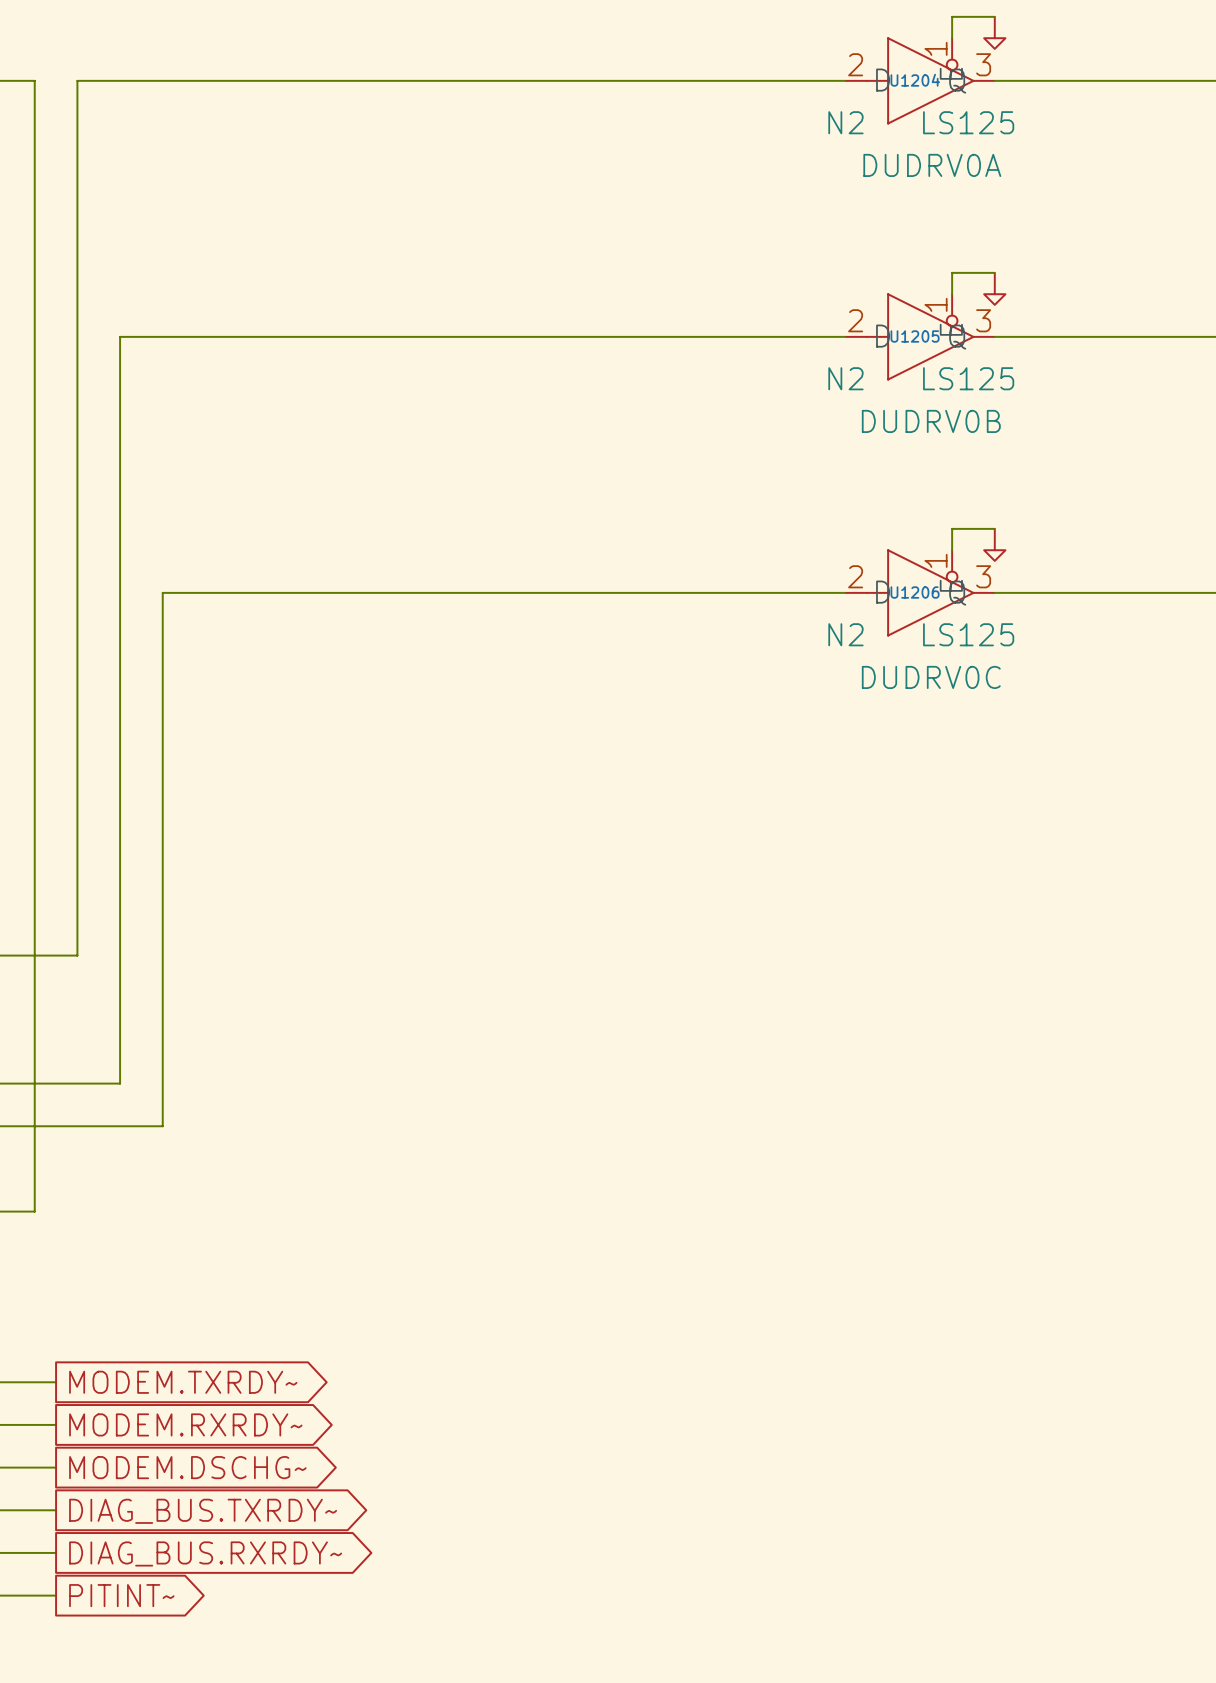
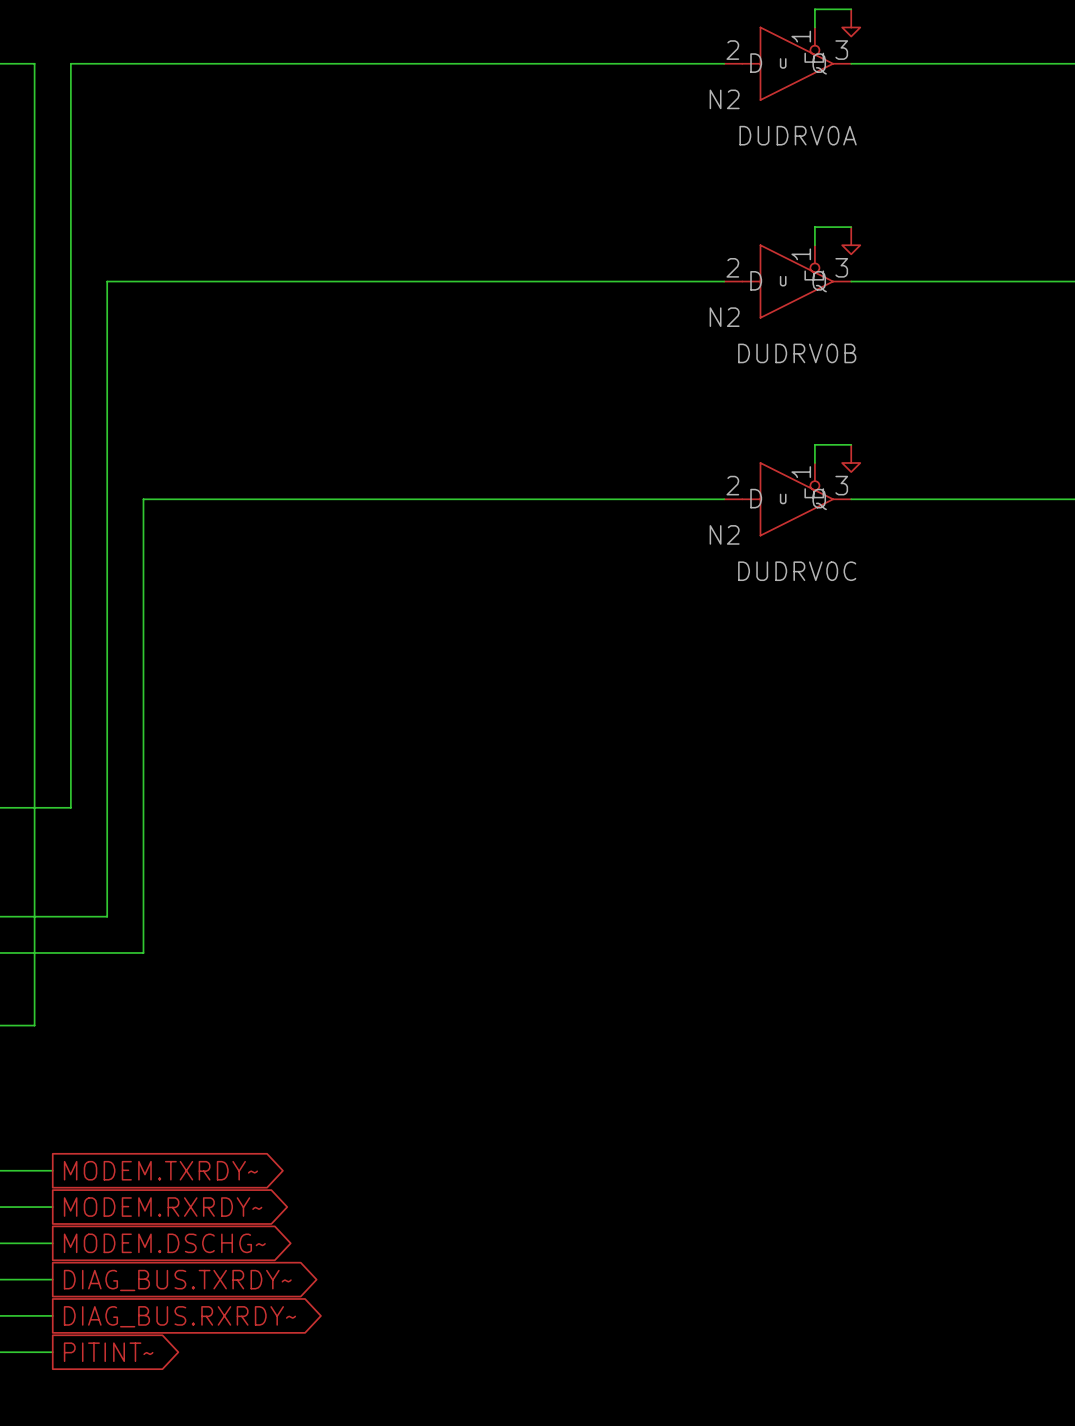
U1204 name: U1204 (915, 80) -> U (783, 63)
U1204 value: LS125 (968, 122) -> none
U1205 name: U1205 (915, 336) -> U (783, 281)
U1205 value: LS125 (968, 378) -> none
U1206 name: U1206 (915, 592) -> U (783, 498)
U1206 value: LS125 (968, 634) -> none

